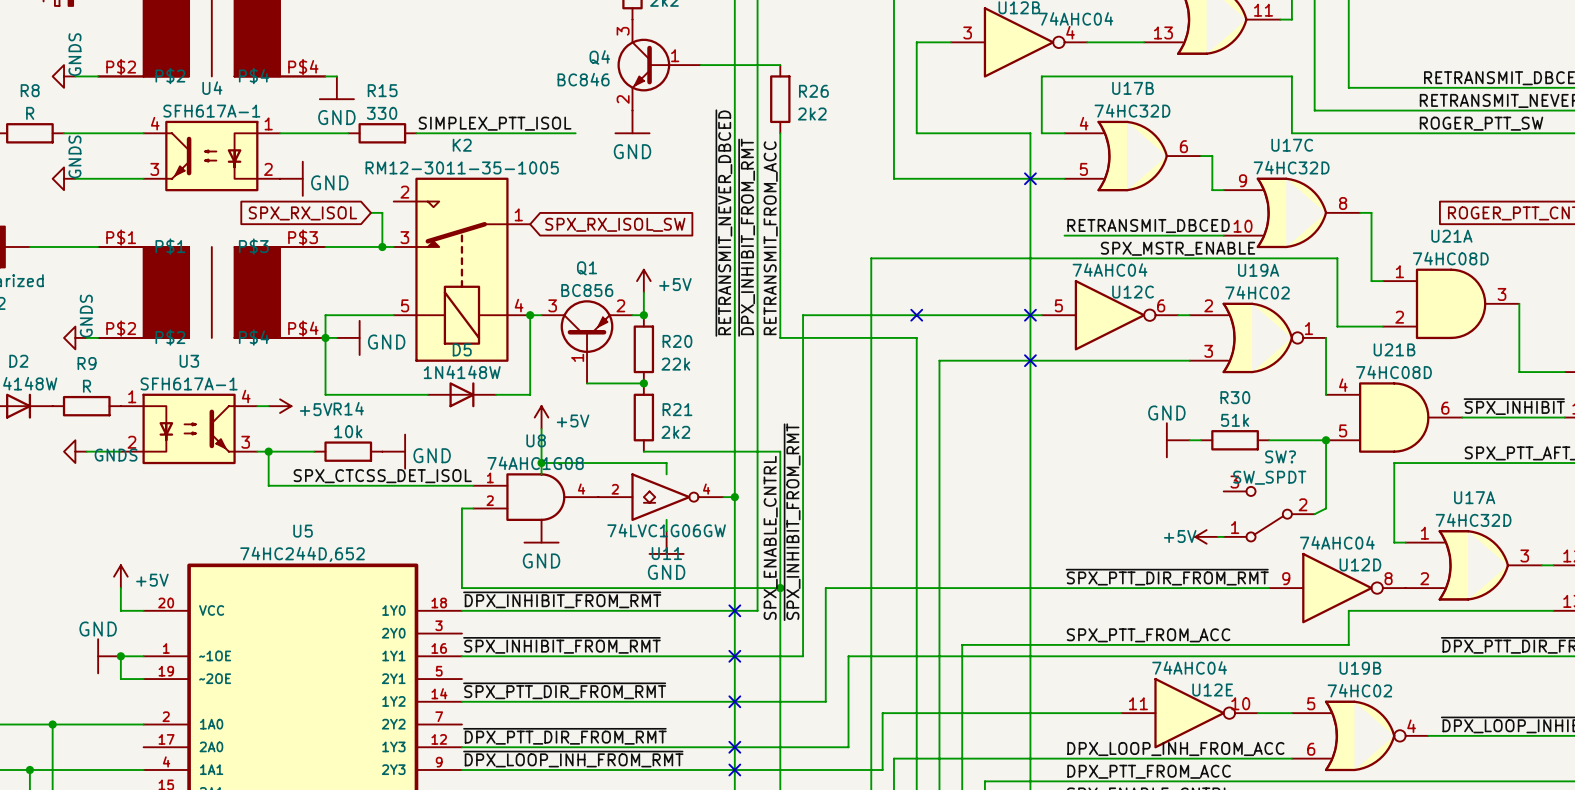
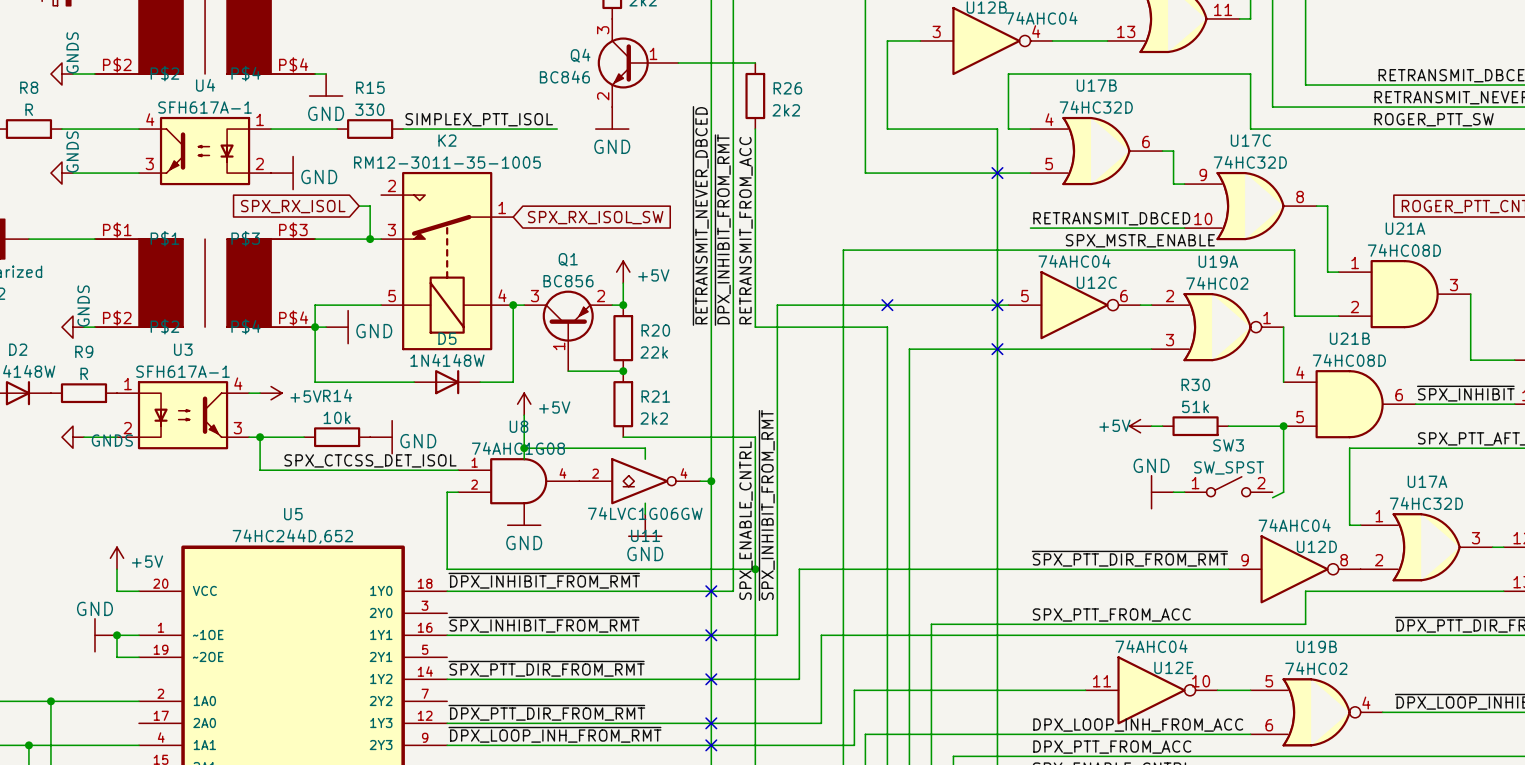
power symbol: GND (1178, 440) -> +5V (1140, 426)
SW3: none -> SW_SPST (1228, 486)
power symbol: none -> GND (1162, 492)
wire: none -> (1173, 492) (1184, 492)
SW?: SW_SPDT (1269, 514) -> none
power symbol: +5V (1206, 536) -> none
wire: (1218, 536) (1223, 536) -> none

